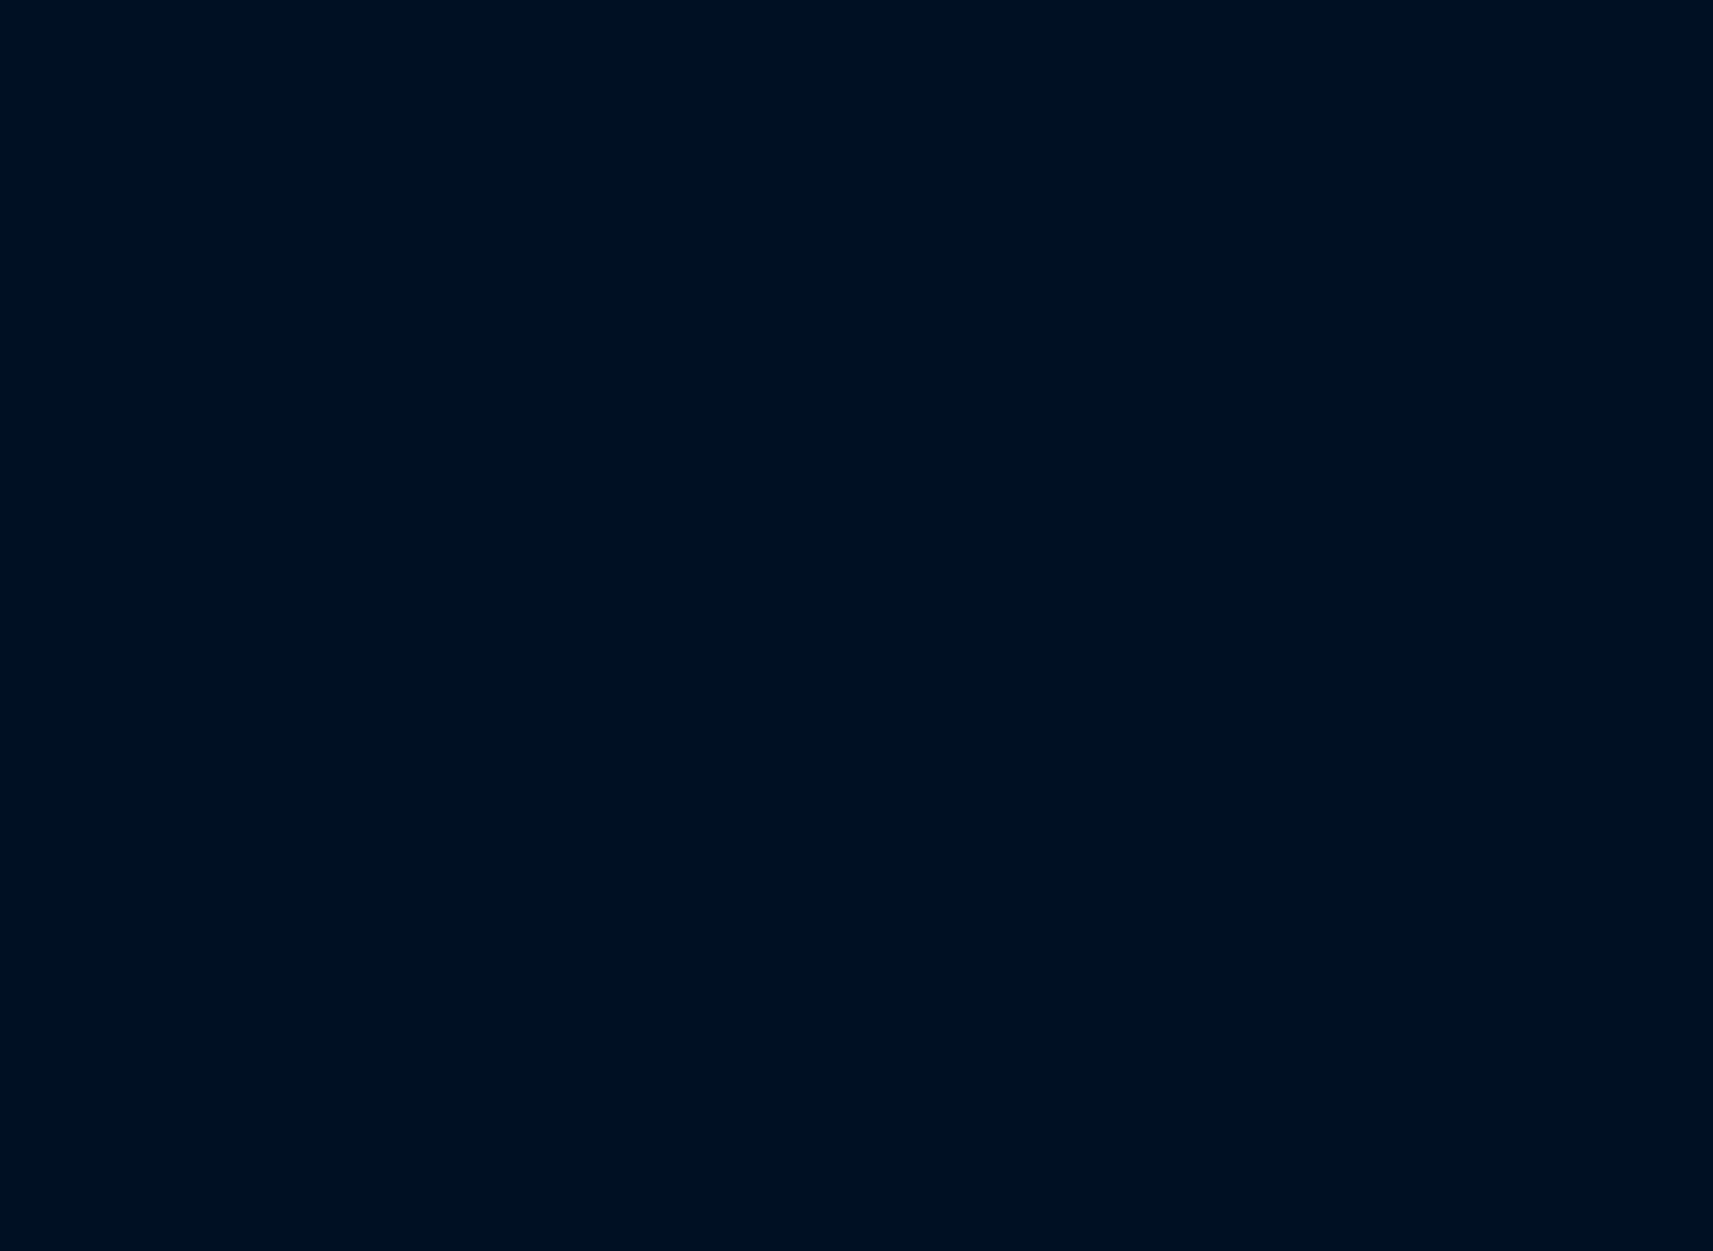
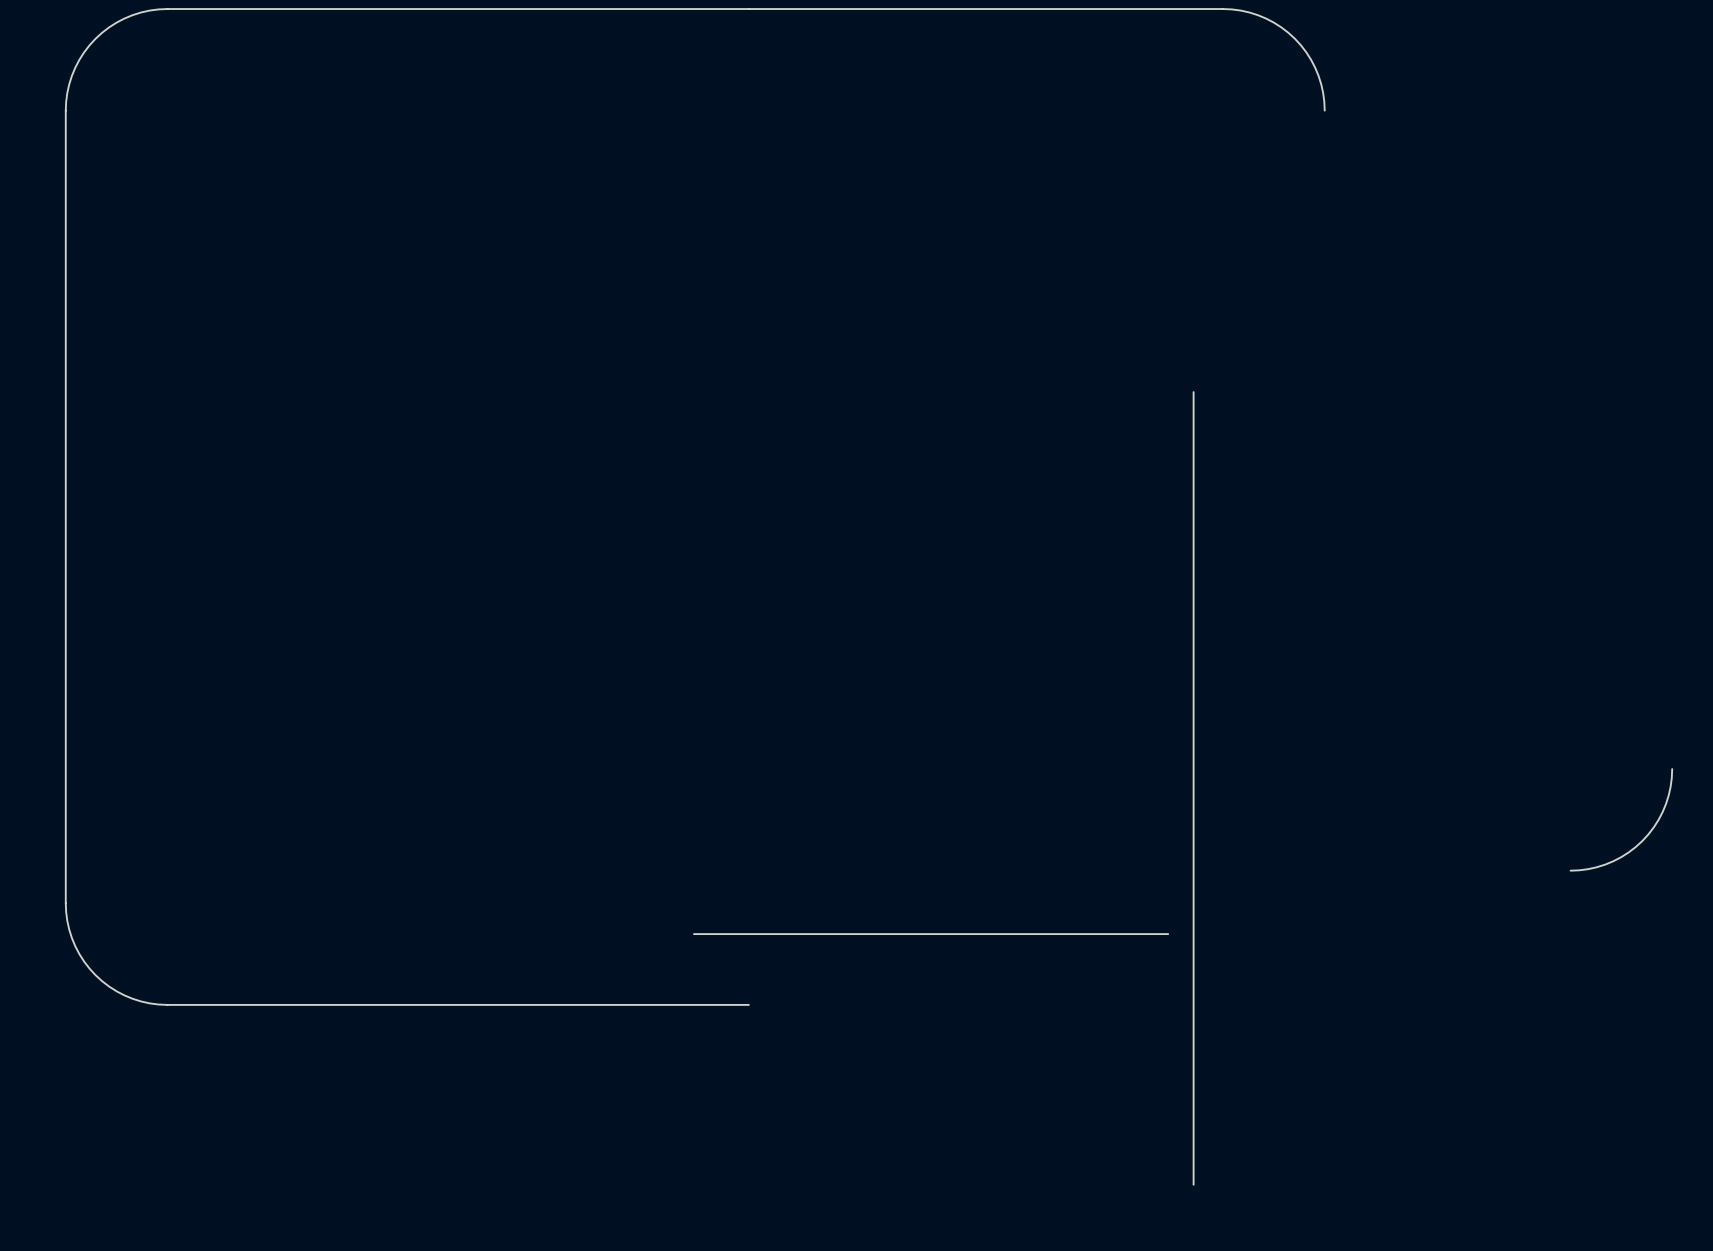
board edge: none -> (1324, 110) (1323, 93) (1318, 75) (1311, 59) (1300, 45) (1288, 32) (1266, 18) (1249, 12) (1231, 9) (167, 9) (141, 12) (116, 22) (102, 32) (84, 52) (75, 67) (69, 84) (65, 110) (65, 903) (67, 920) (71, 938) (84, 961) (95, 975) (116, 991) (141, 1001) (158, 1004) (748, 1004)
board edge: none -> (1193, 392) (1193, 1184)
board edge: none -> (1672, 769) (1670, 786) (1666, 803) (1658, 819) (1642, 840) (1628, 852) (1613, 861) (1596, 867) (1570, 870)
board edge: none -> (693, 934) (1168, 934)

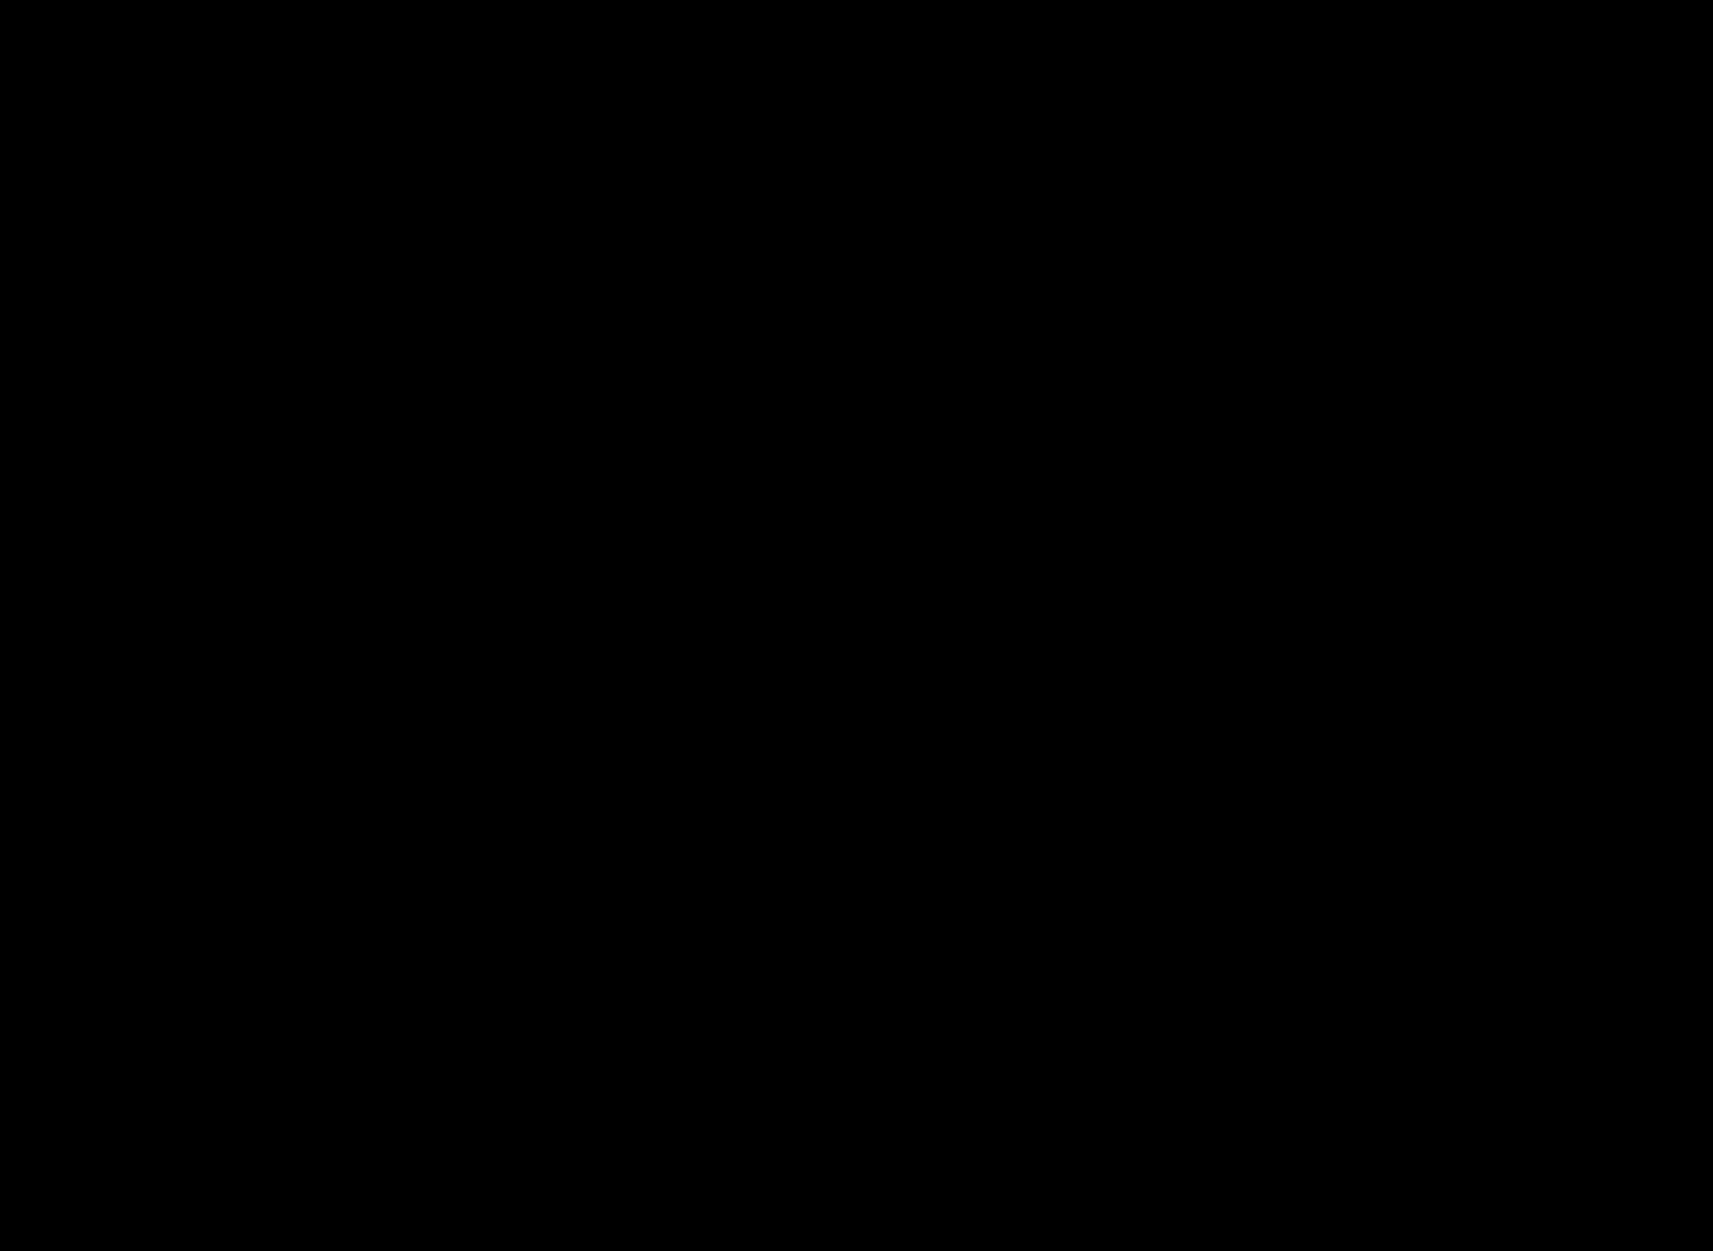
board edge: (1324, 110) (1323, 93) (1318, 75) (1311, 59) (1300, 45) (1288, 32) (1266, 18) (1249, 12) (1231, 9) (167, 9) (141, 12) (116, 22) (102, 32) (84, 52) (75, 67) (69, 84) (65, 110) (65, 903) (67, 920) (71, 938) (84, 961) (95, 975) (116, 991) (141, 1001) (158, 1004) (748, 1004) -> none
board edge: (1193, 392) (1193, 1184) -> none
board edge: (1672, 769) (1670, 786) (1666, 803) (1658, 819) (1642, 840) (1628, 852) (1613, 861) (1596, 867) (1570, 870) -> none
board edge: (693, 934) (1168, 934) -> none

